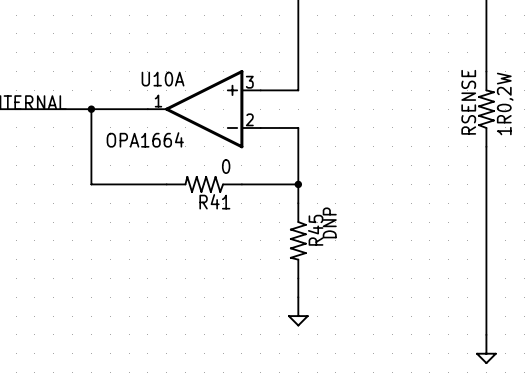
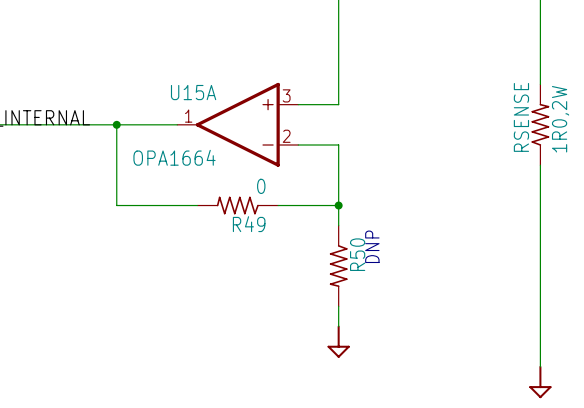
U10A name: U10A (163, 79) -> U15A (193, 92)
R41 name: R41 (214, 201) -> R49 (249, 224)
R45 name: R45 (315, 230) -> R50 (357, 254)

